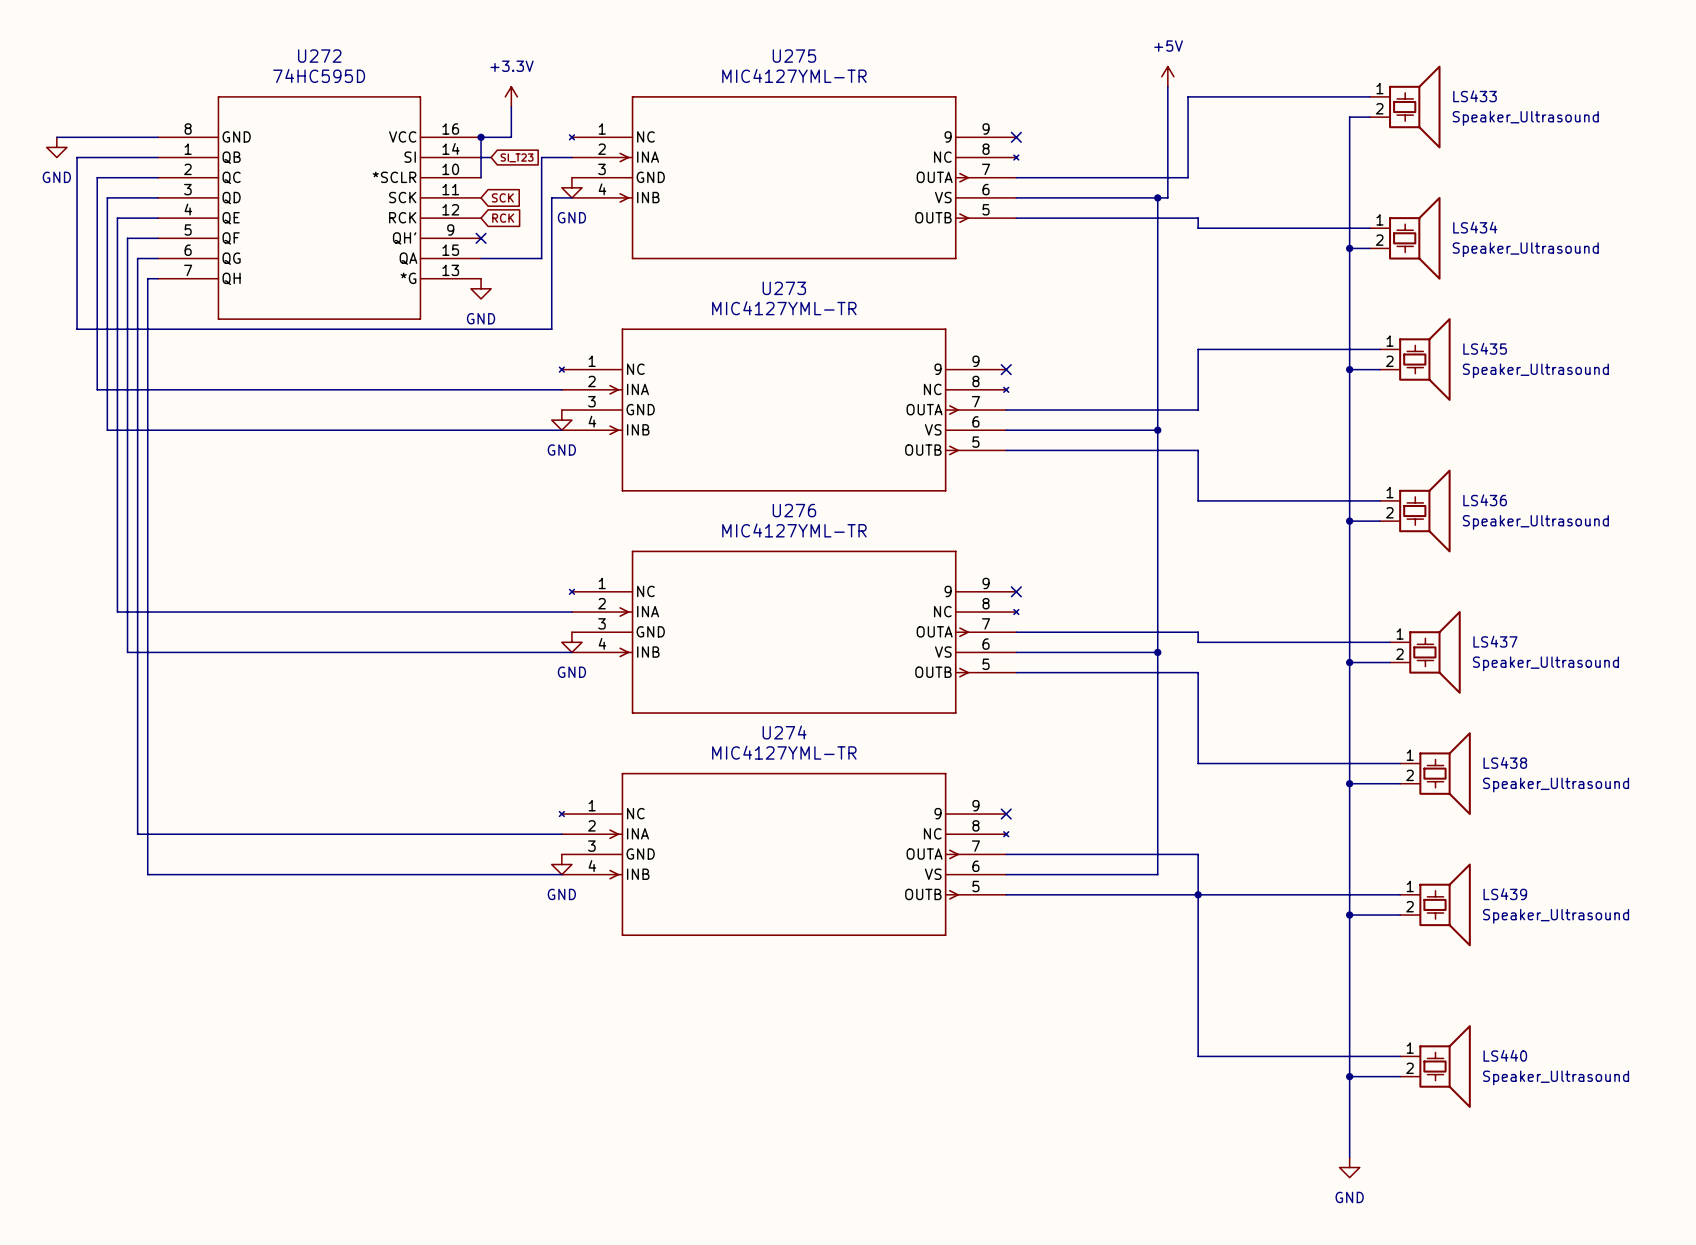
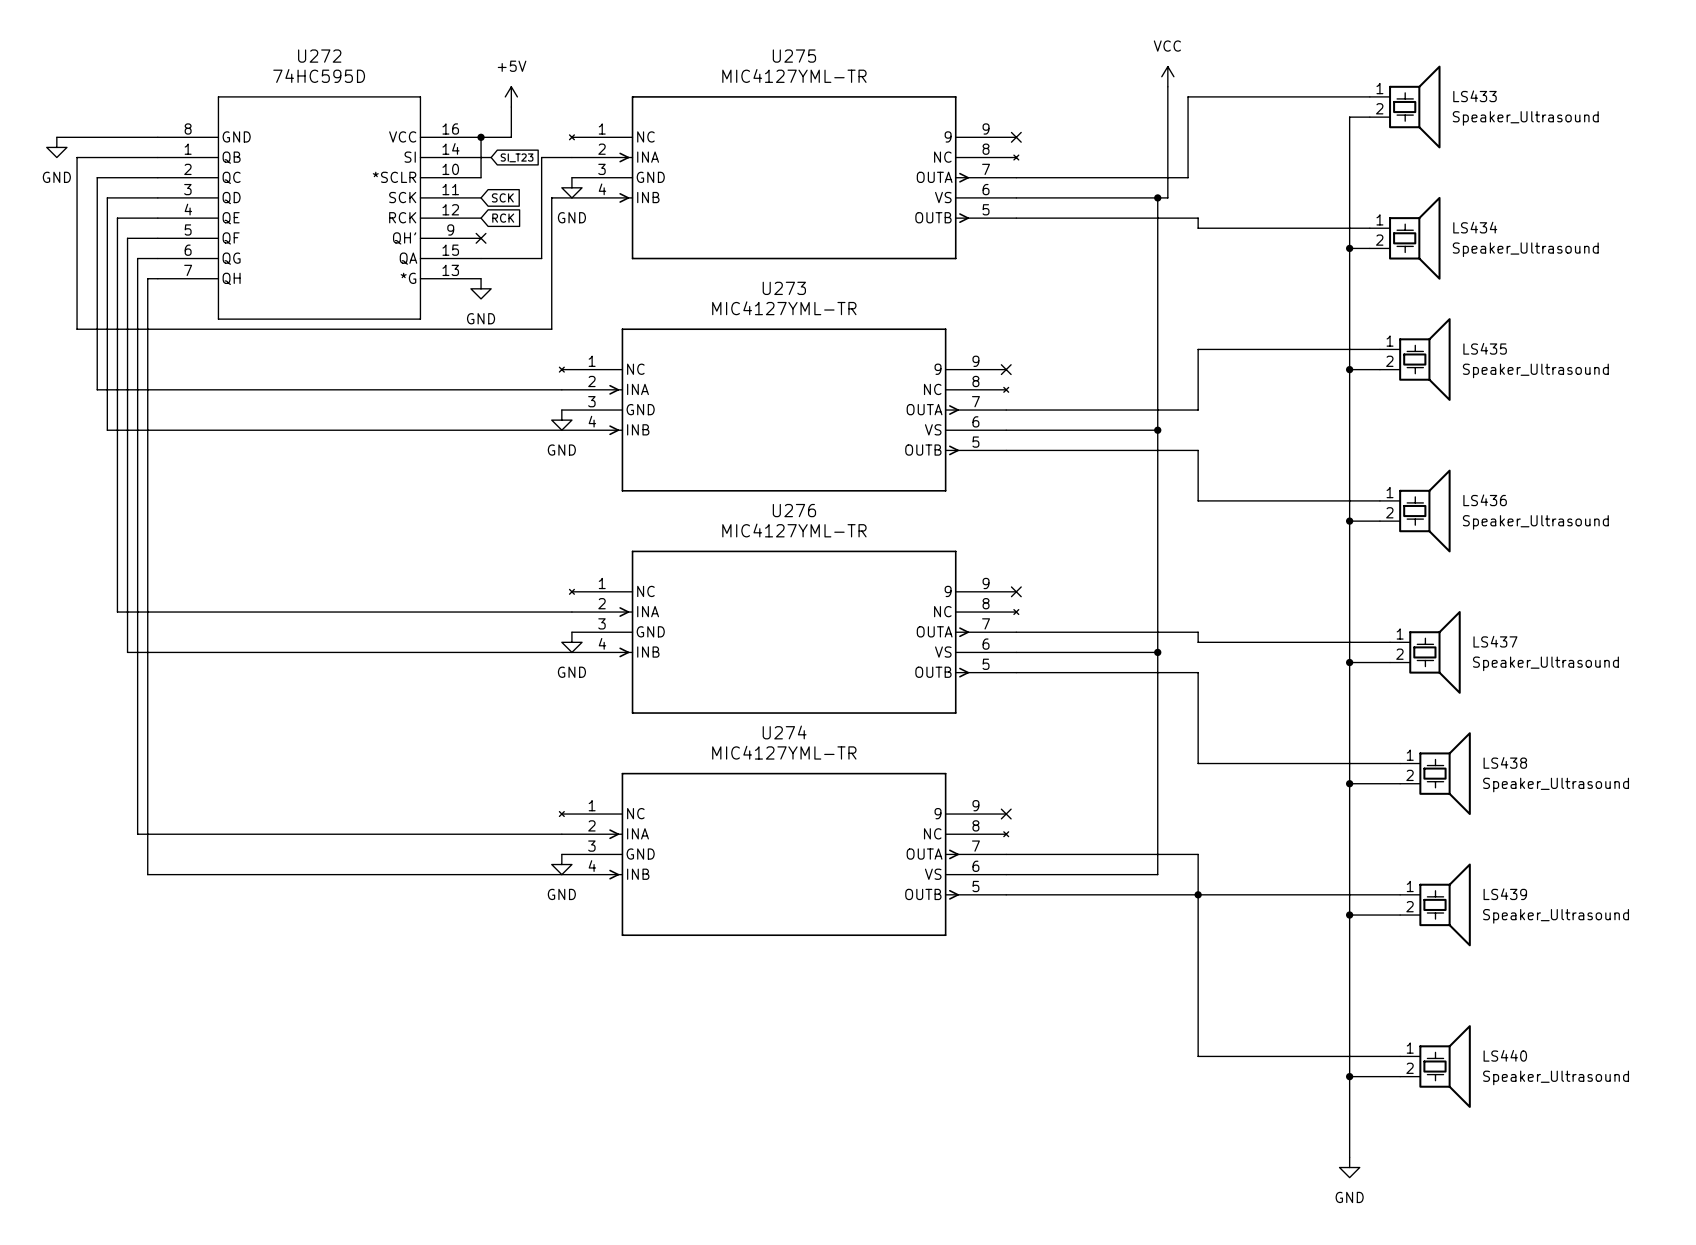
power symbol: +5V (1167, 76) -> VCC (1167, 76)
power symbol: +3.3V (511, 96) -> +5V (511, 96)

